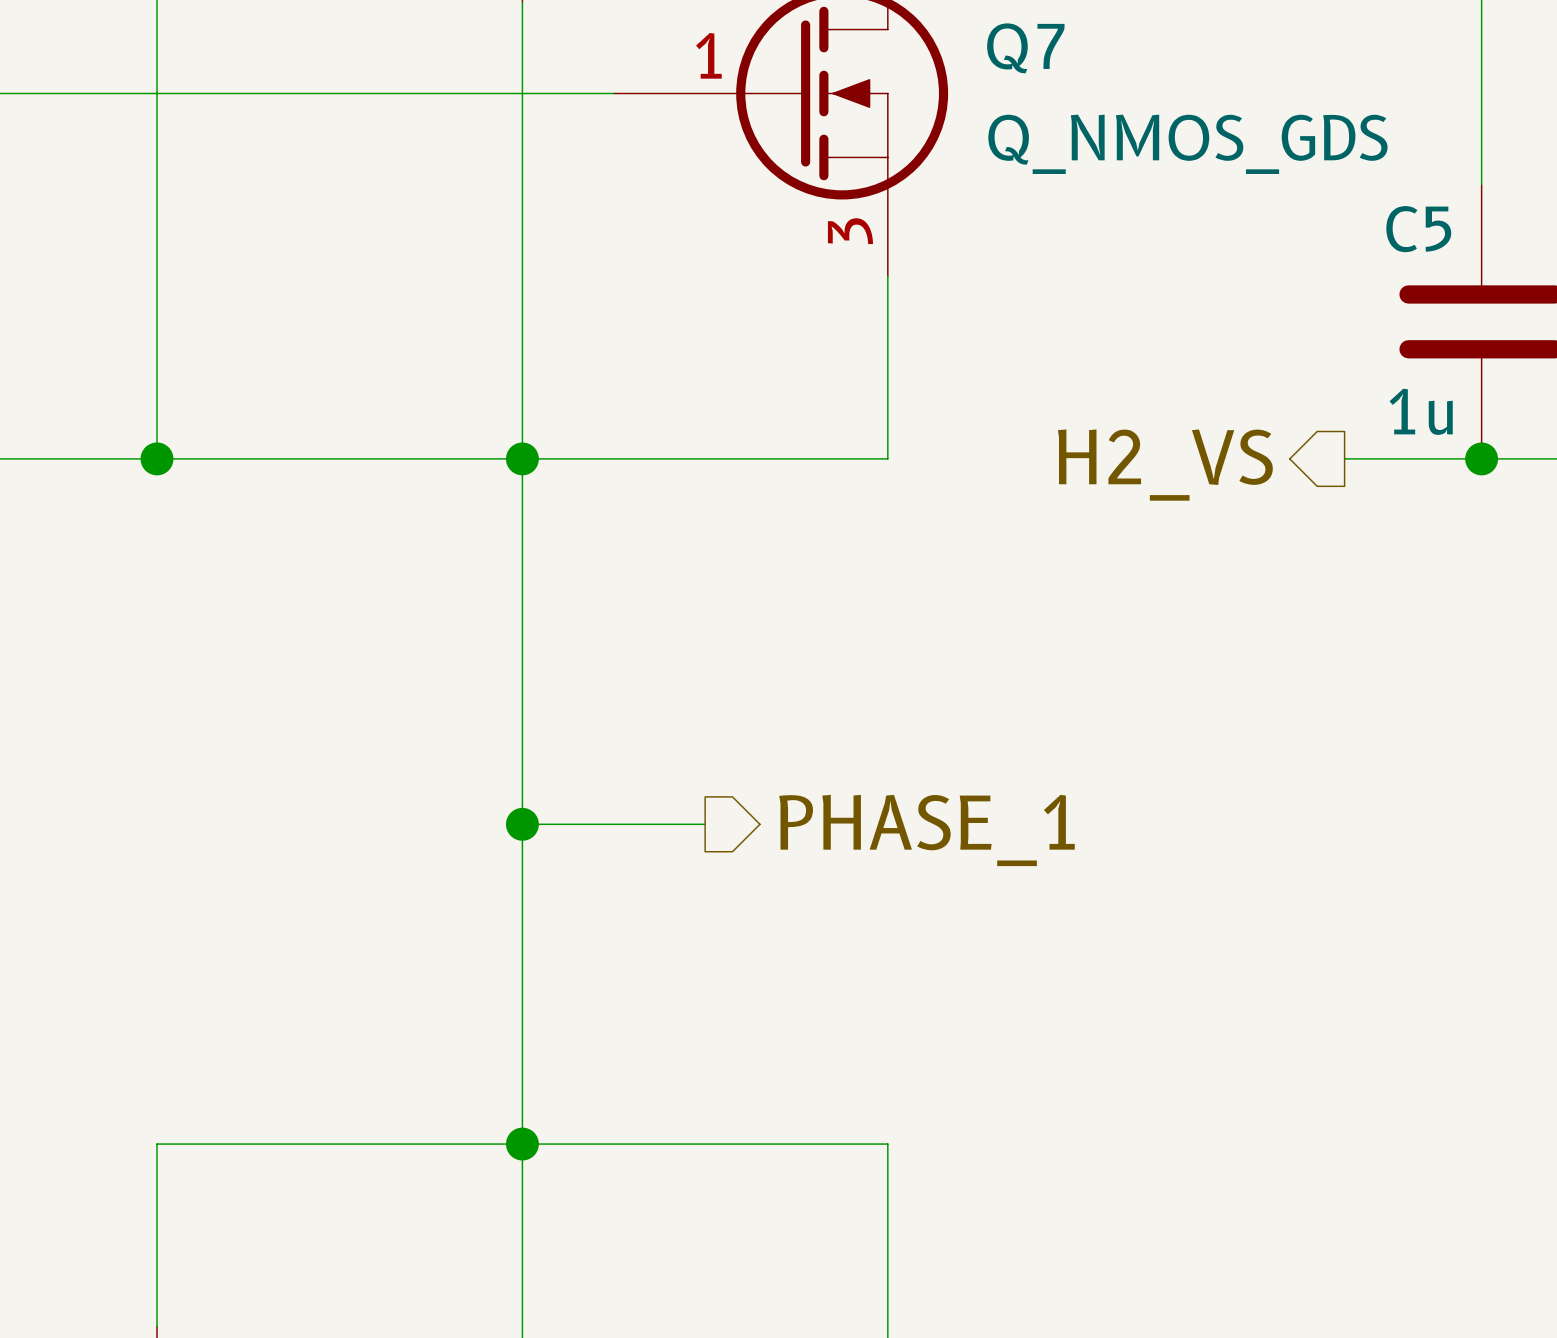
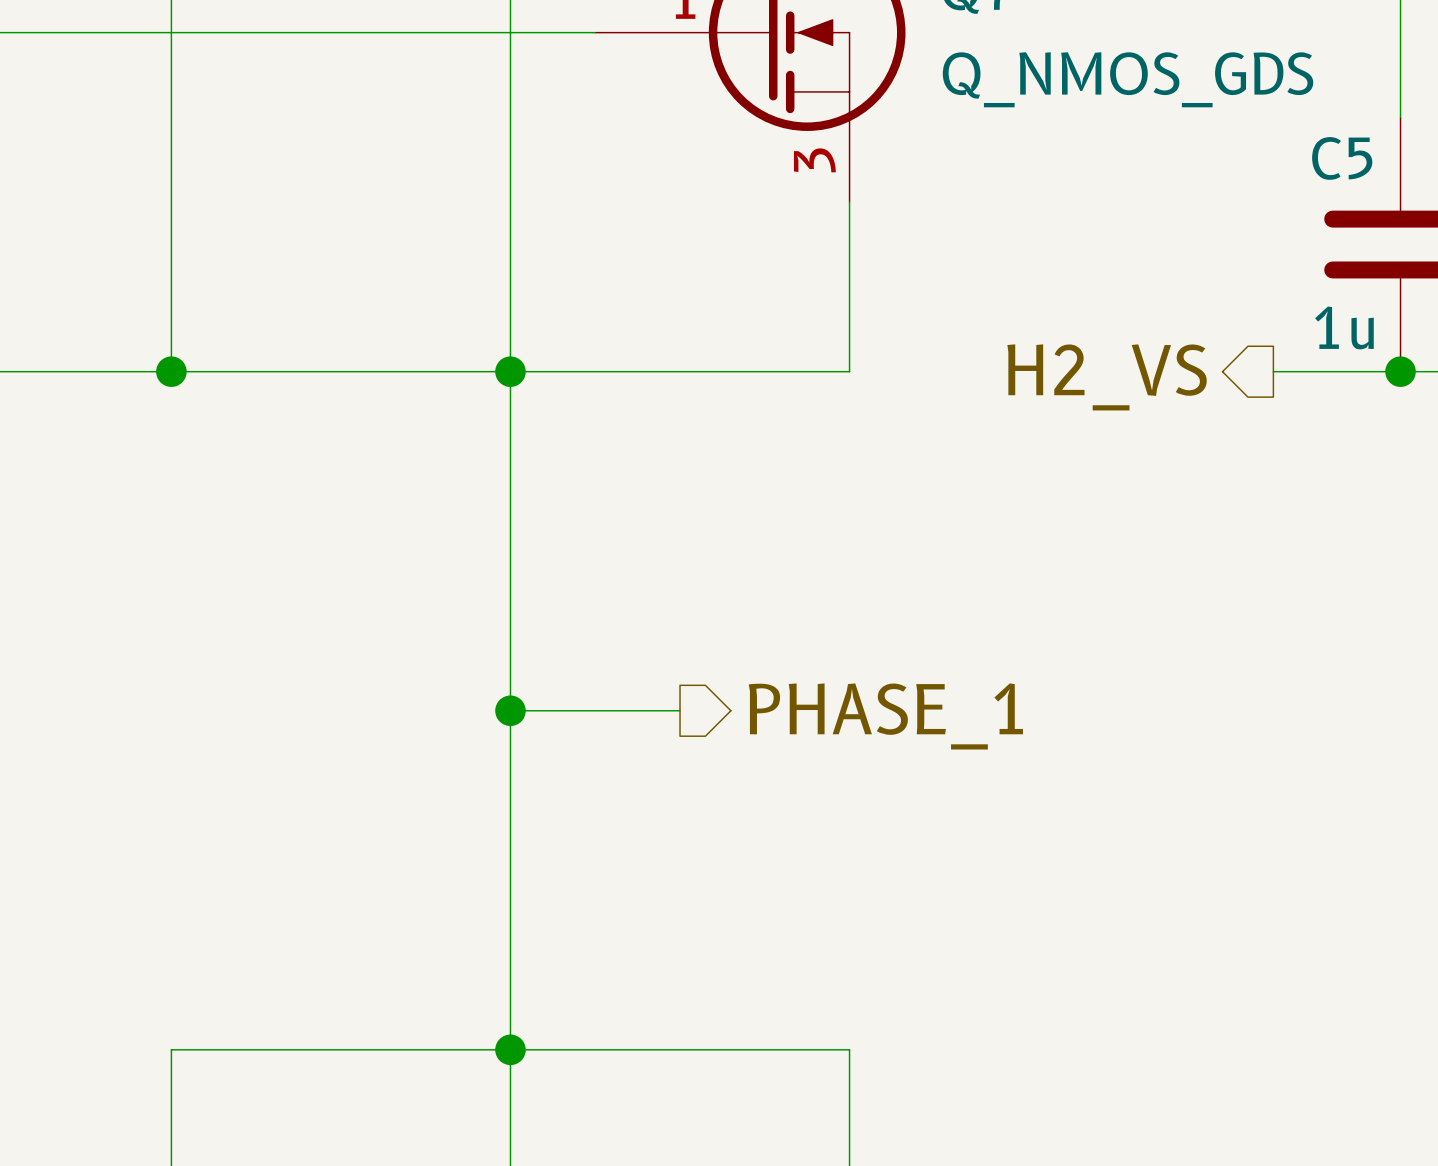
junction position: (522, 1144) -> (510, 1049)
wire: (157, 1189) (157, 1144) (887, 1144) (887, 1189) -> (171, 1049) (849, 1049)

